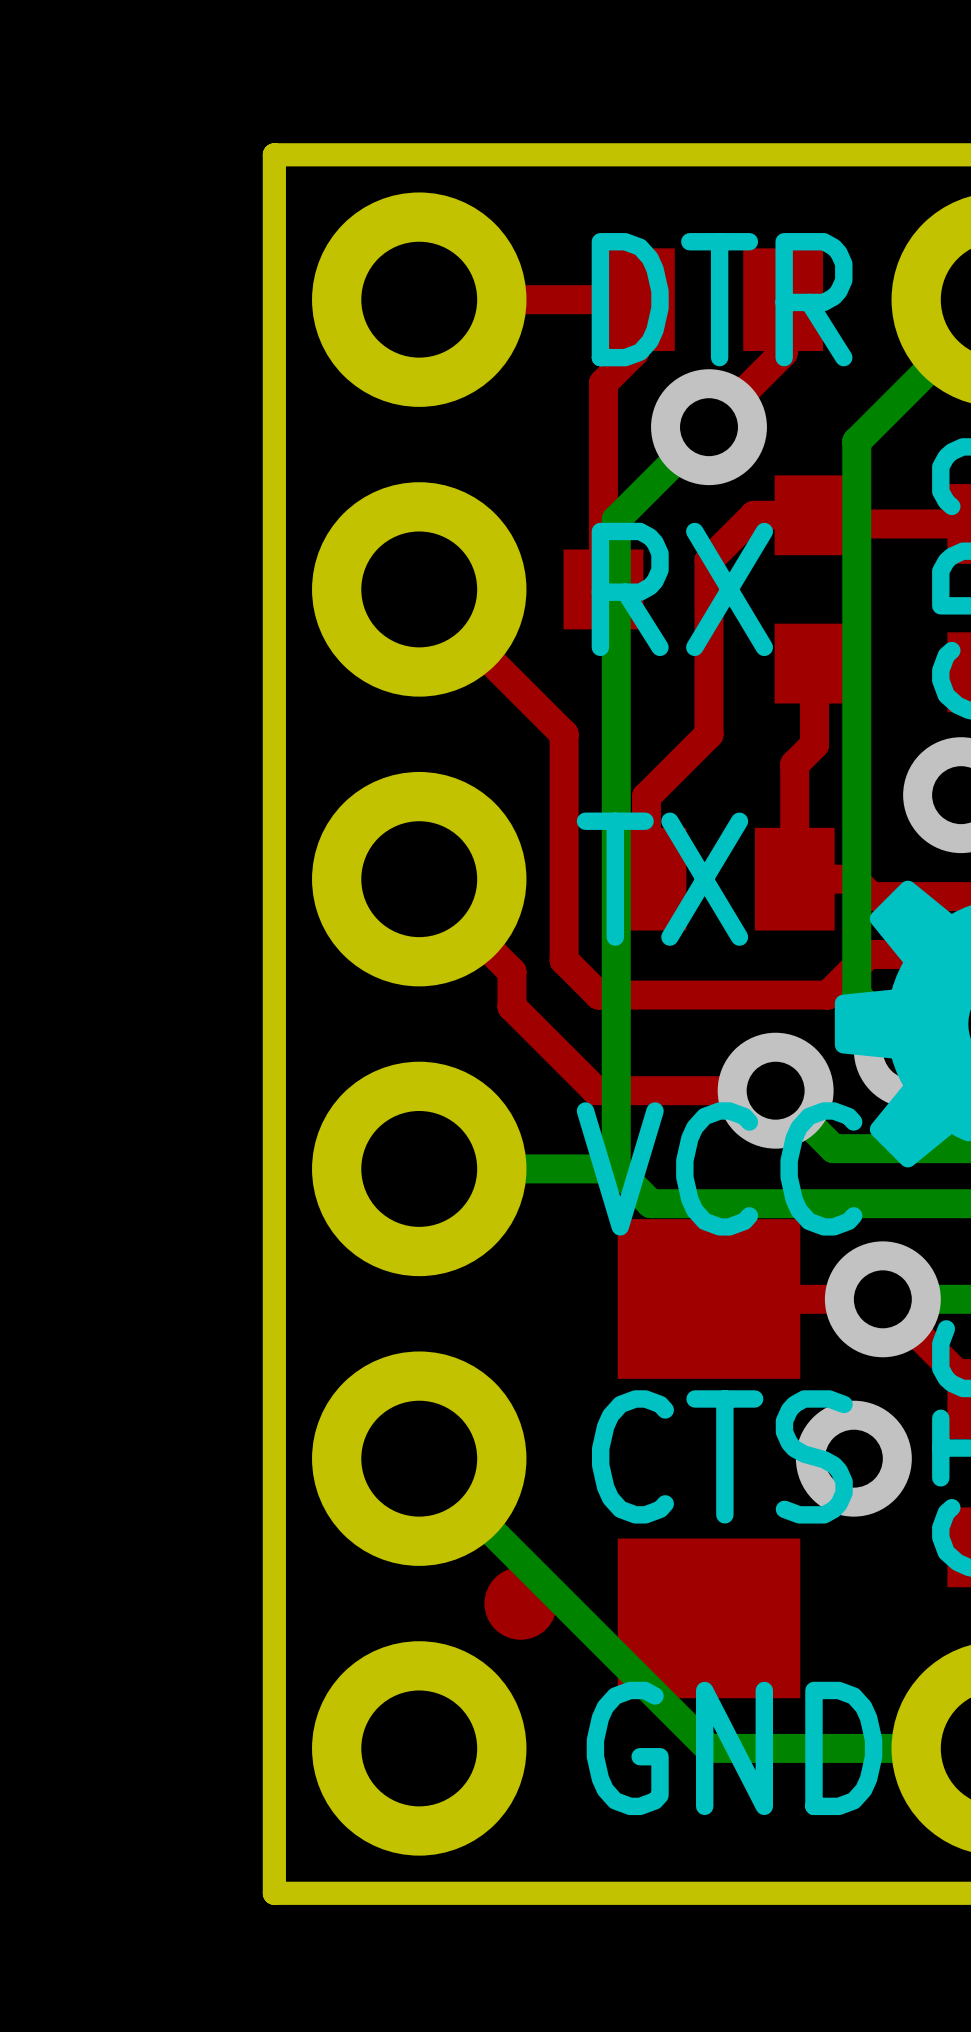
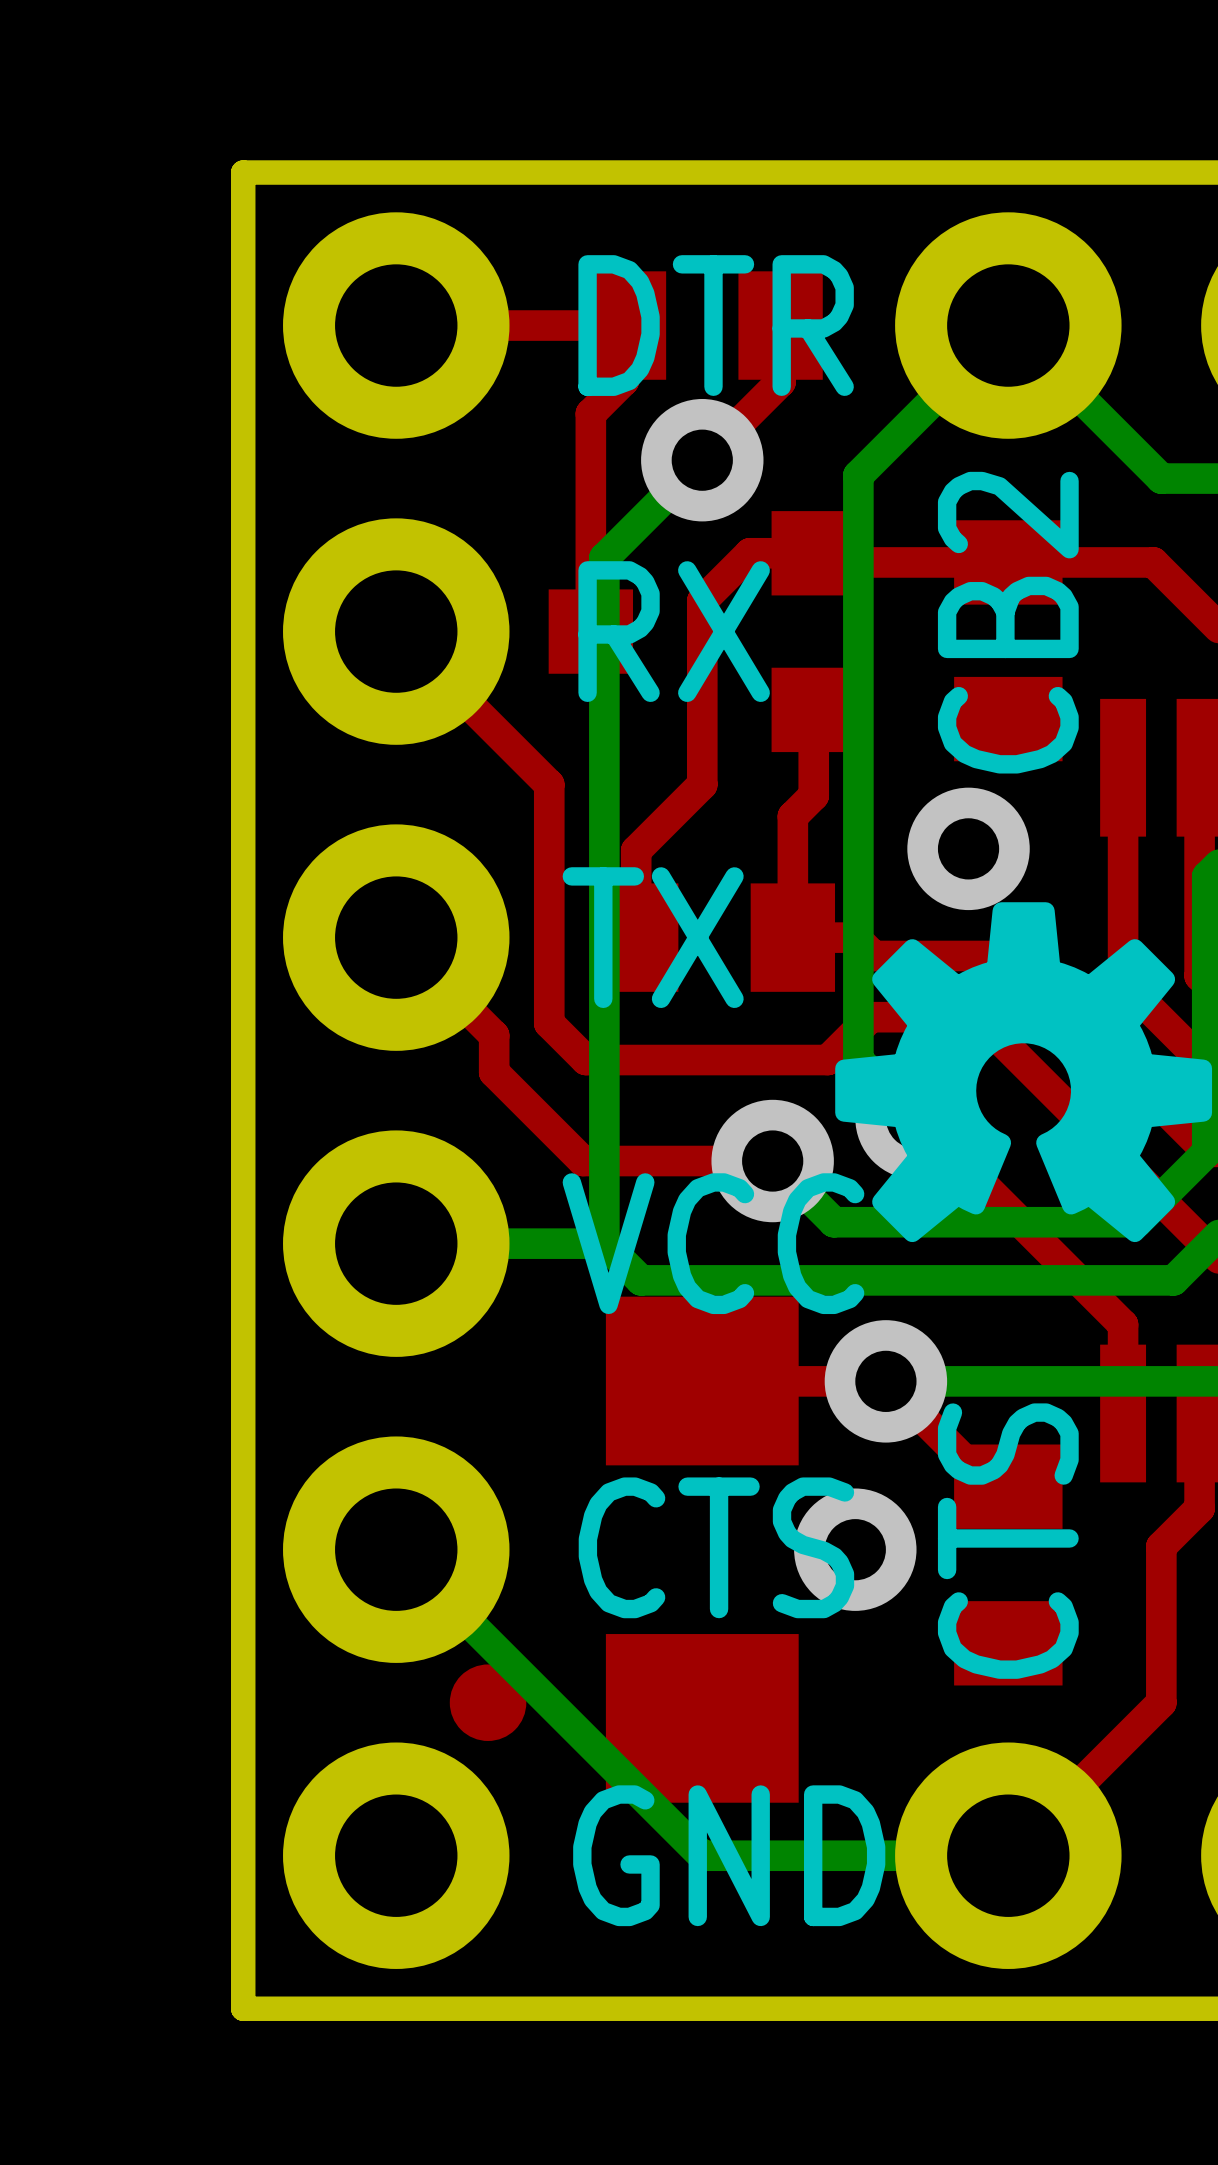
part position: (520, 1603) -> (488, 1702)

